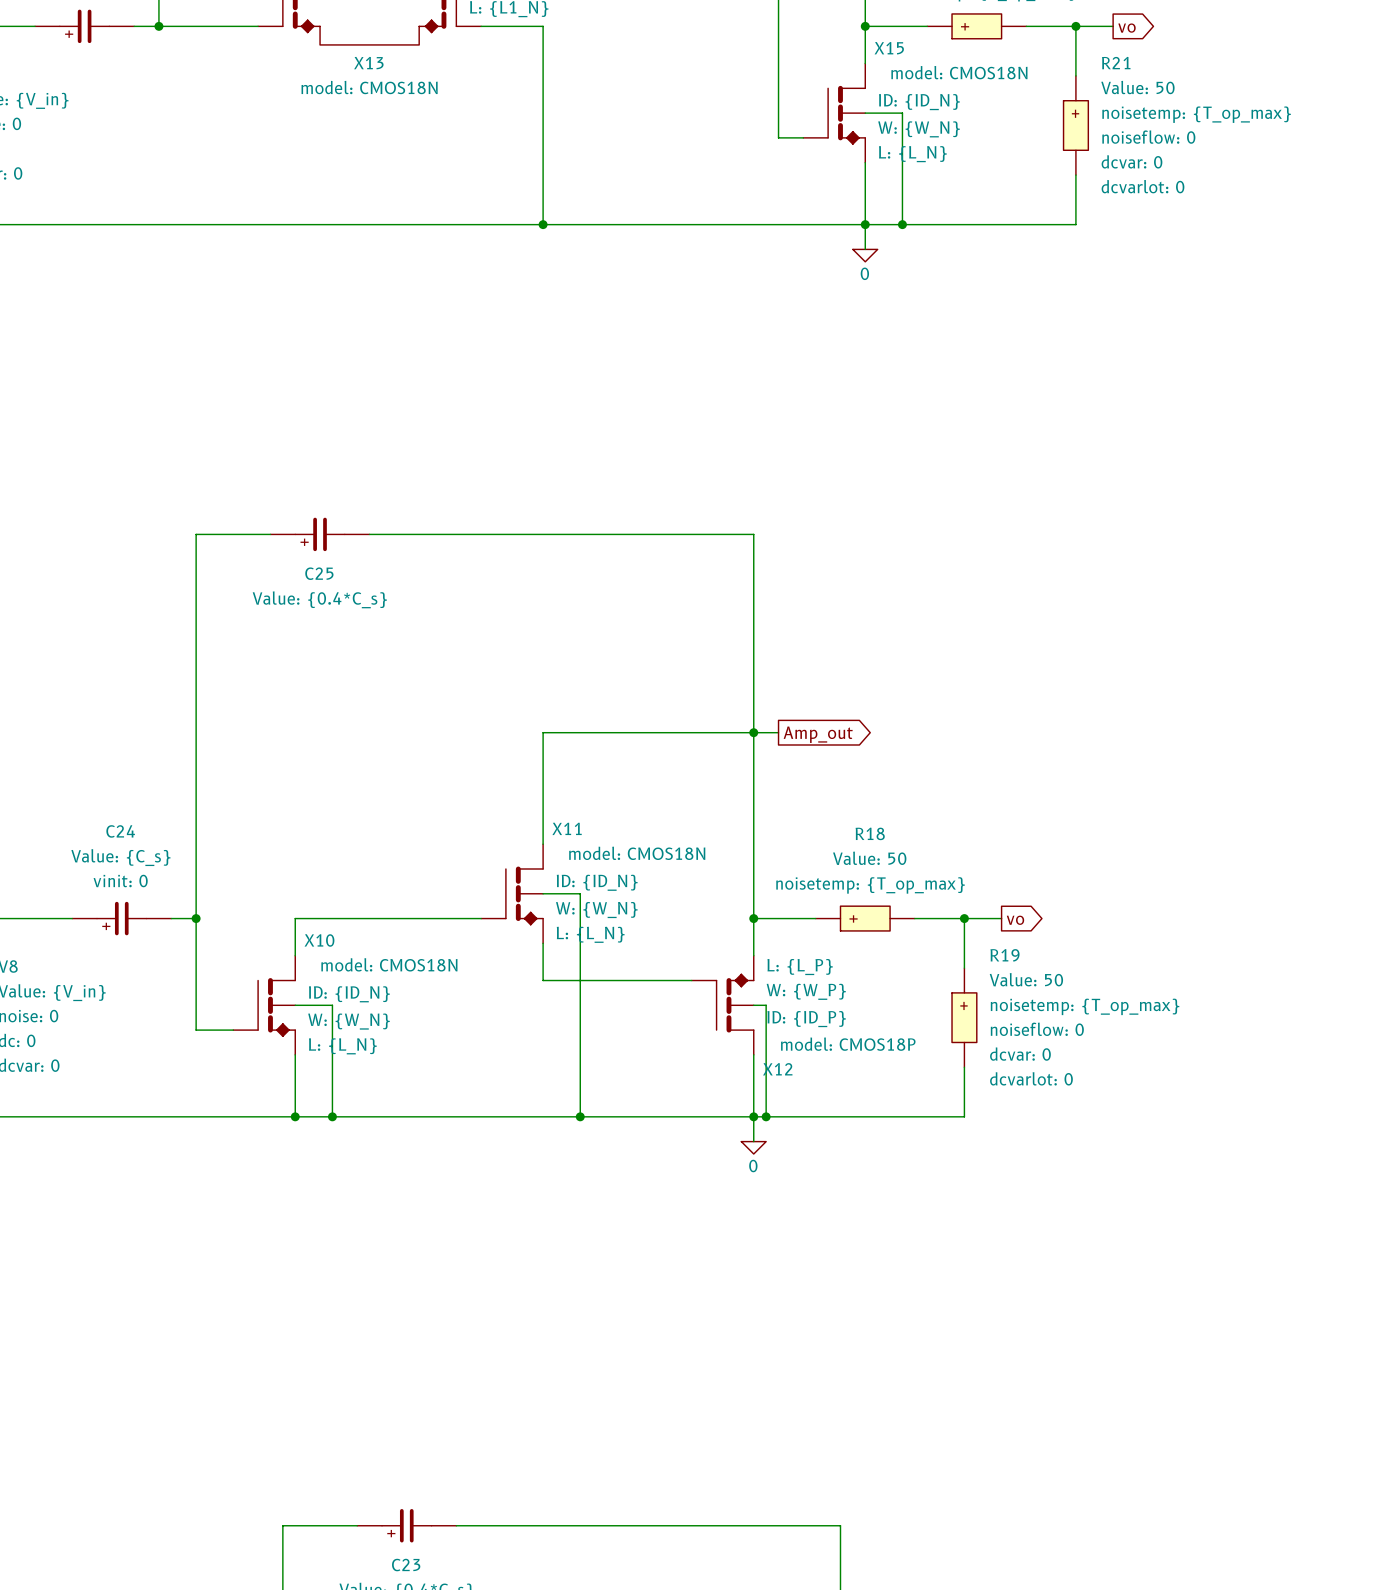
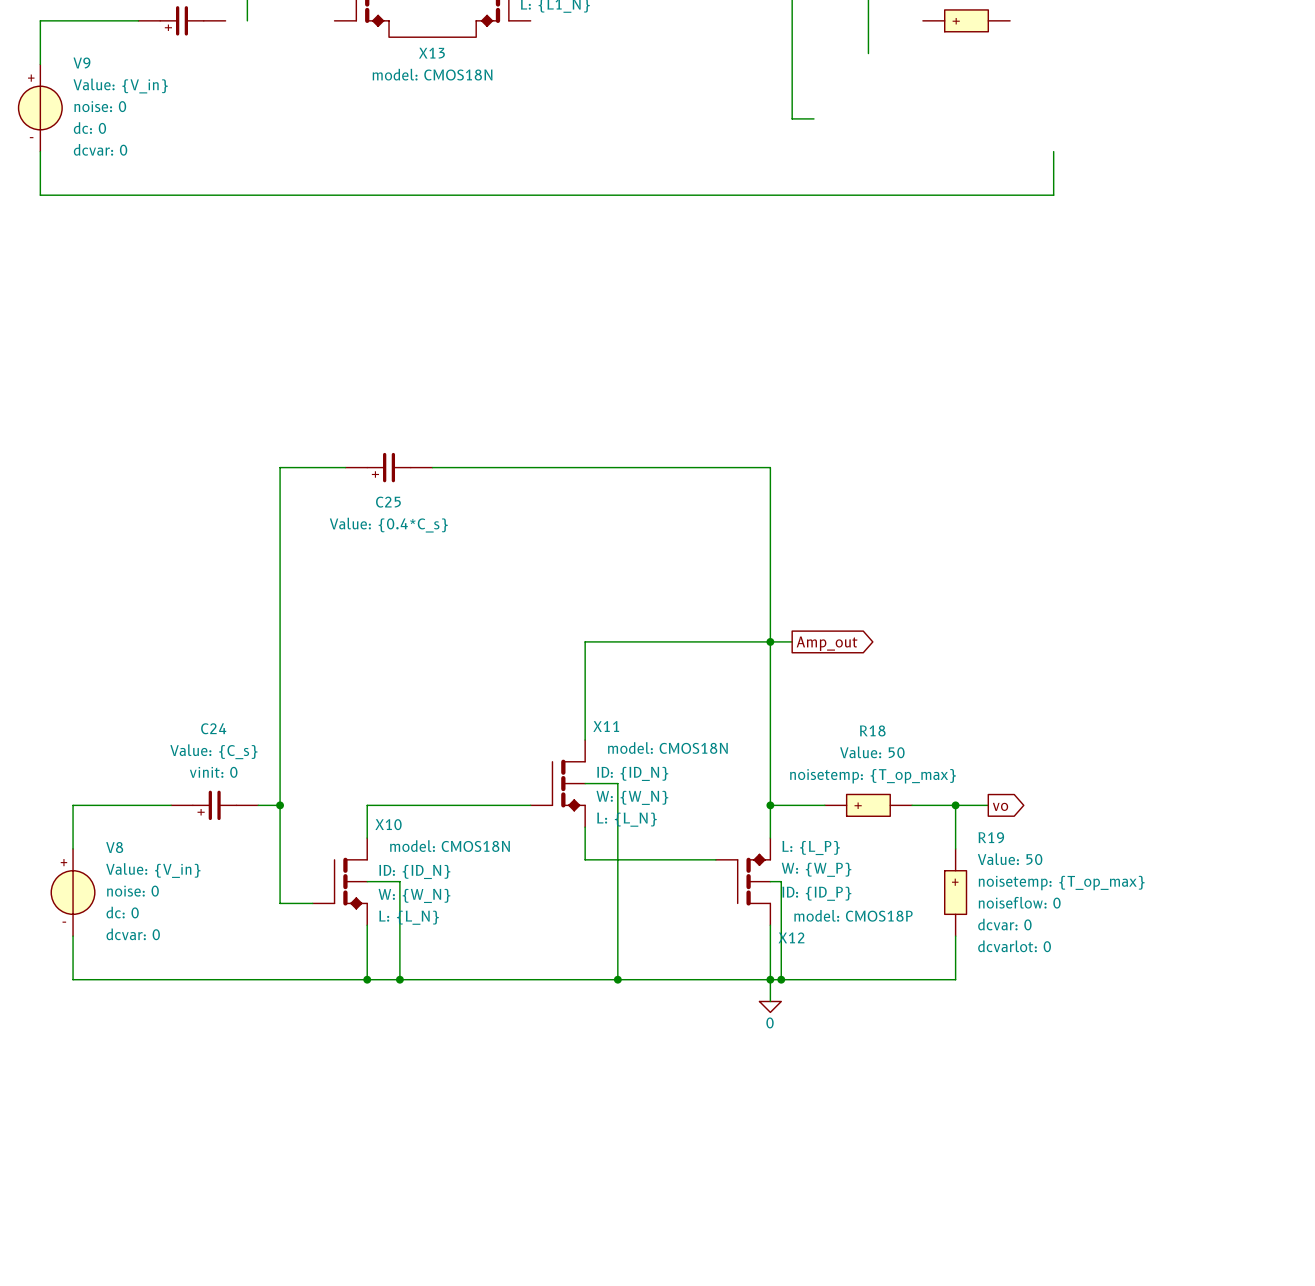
wire: (134, 26) (258, 26) -> none
junction: (158, 26) -> none
wire: (481, 26) (543, 26) (543, 224) -> none
wire: (865, 26) (927, 26) -> none
junction: (865, 26) -> none
wire: (1026, 26) (1113, 26) -> none
wire: (1075, 26) (1075, 75) -> none
junction: (1075, 26) -> none
global label: vo (1127, 28) -> none
X15: (834, 113) -> none
wire: (865, 113) (902, 113) (902, 224) -> none
R21: Value: 50 (1075, 125) -> none
wire: (865, 162) (865, 249) -> none
junction: (543, 224) -> none
junction: (865, 224) -> none
junction: (902, 224) -> none
power symbol: 0 (865, 255) -> none

